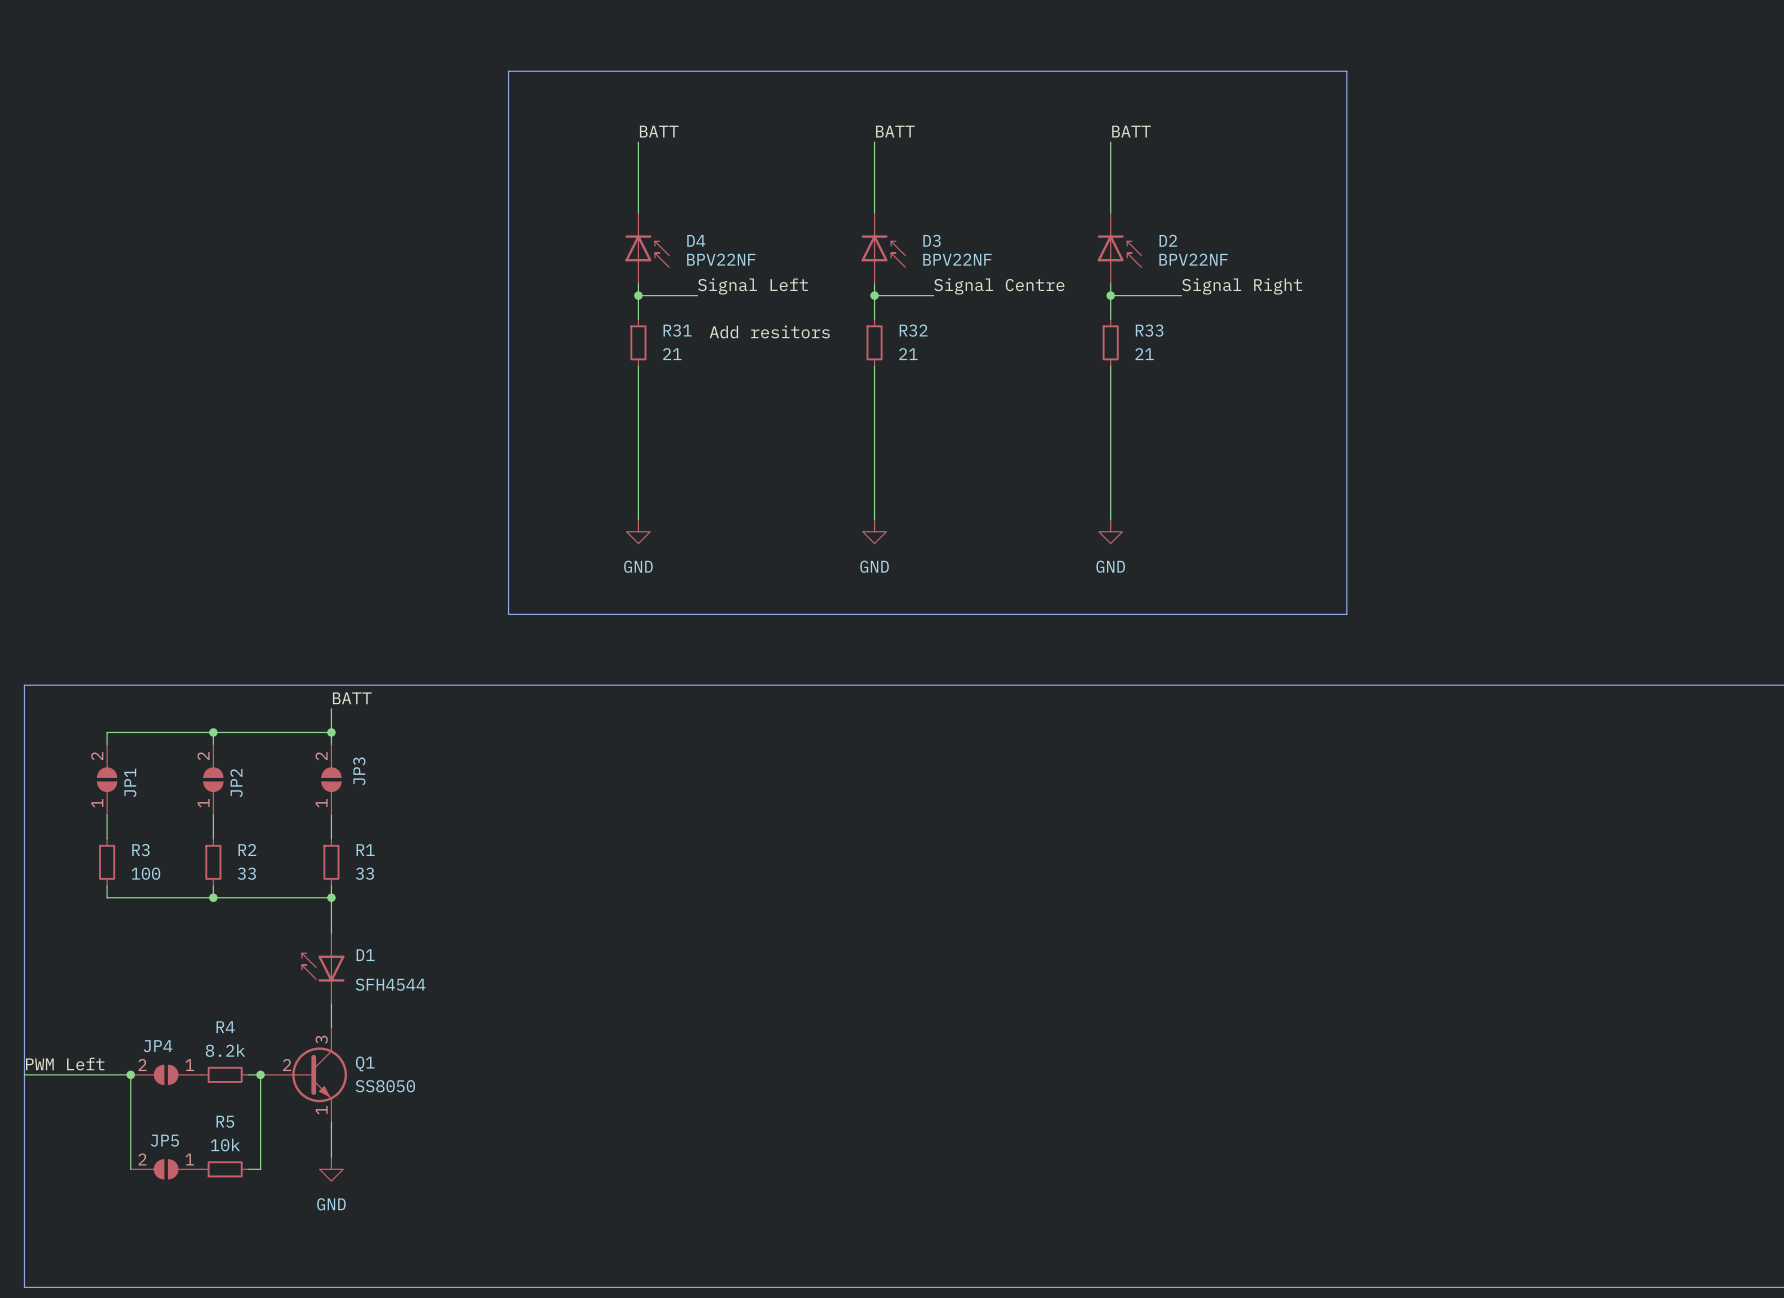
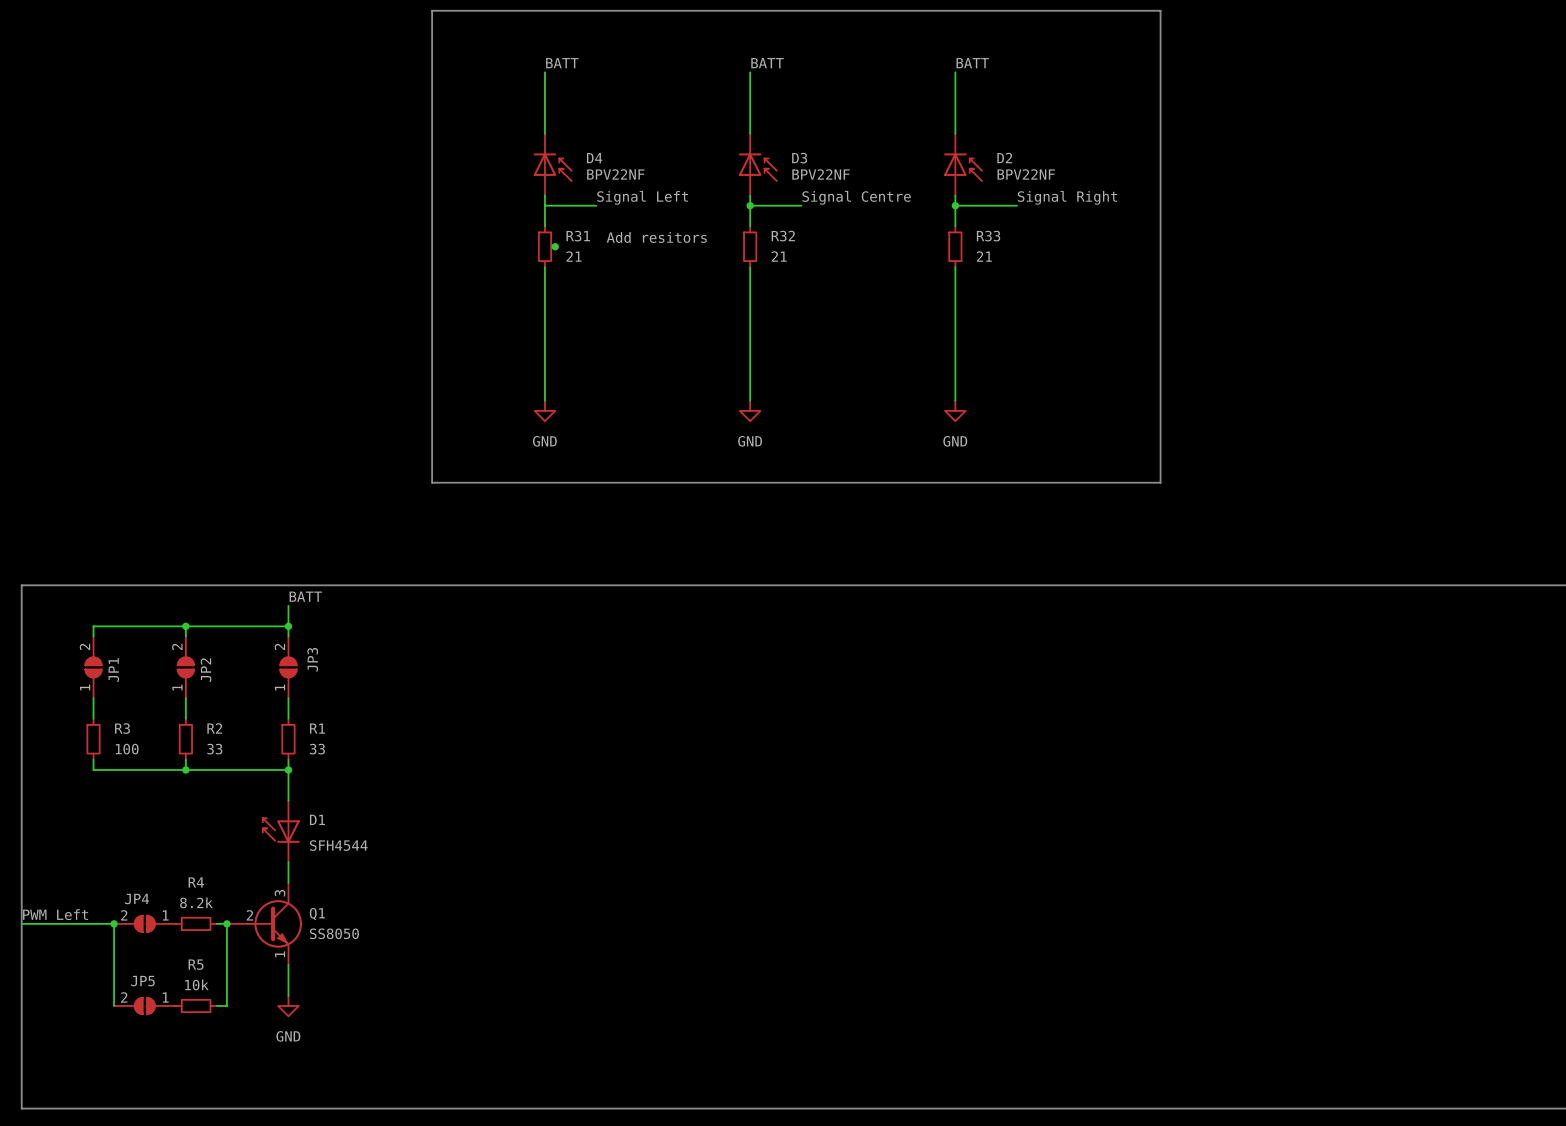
line: (508, 71) (1346, 71) (1346, 614) (508, 614) (508, 71) -> (432, 10) (1160, 10) (1160, 482) (432, 482) (432, 10)
label position: BATT (659, 131) -> BATT (562, 63)
label position: BATT (895, 131) -> BATT (767, 63)
label position: BATT (1131, 131) -> BATT (972, 63)
wire: (638, 142) (638, 212) -> (544, 72) (544, 133)
wire: (874, 142) (874, 212) -> (750, 72) (750, 133)
wire: (1110, 142) (1110, 212) -> (955, 72) (955, 133)
label: none -> Signal Left (642, 197)
D4 position: (647, 248) -> (552, 164)
D3 position: (883, 248) -> (757, 164)
D2 position: (1119, 248) -> (963, 164)
wire: (638, 283) (638, 319) -> (544, 195) (544, 226)
wire: (874, 283) (874, 319) -> (750, 195) (750, 226)
wire: (1110, 283) (1110, 319) -> (955, 195) (955, 226)
label: Signal Left (753, 286) -> Add resitors (656, 237)
label position: Signal Centre (999, 286) -> Signal Centre (856, 197)
label position: Signal Right (1242, 286) -> Signal Right (1067, 197)
wire: (638, 295) (697, 295) -> (544, 205) (596, 205)
wire: (874, 295) (933, 295) -> (750, 205) (801, 205)
junction position: (874, 295) -> (750, 205)
wire: (1110, 295) (1181, 295) -> (955, 205) (1016, 205)
junction position: (1110, 295) -> (955, 205)
label: Add resitors (769, 331) -> none
R31 position: (638, 342) -> (544, 246)
R32 position: (874, 342) -> (750, 246)
R33 position: (1110, 342) -> (955, 246)
wire: (638, 366) (638, 519) -> (544, 267) (544, 400)
wire: (874, 366) (874, 519) -> (750, 267) (750, 400)
wire: (1110, 366) (1110, 519) -> (955, 267) (955, 400)
power symbol position: GND (638, 531) -> GND (544, 410)
power symbol position: GND (874, 531) -> GND (750, 410)
power symbol position: GND (1110, 531) -> GND (955, 410)

